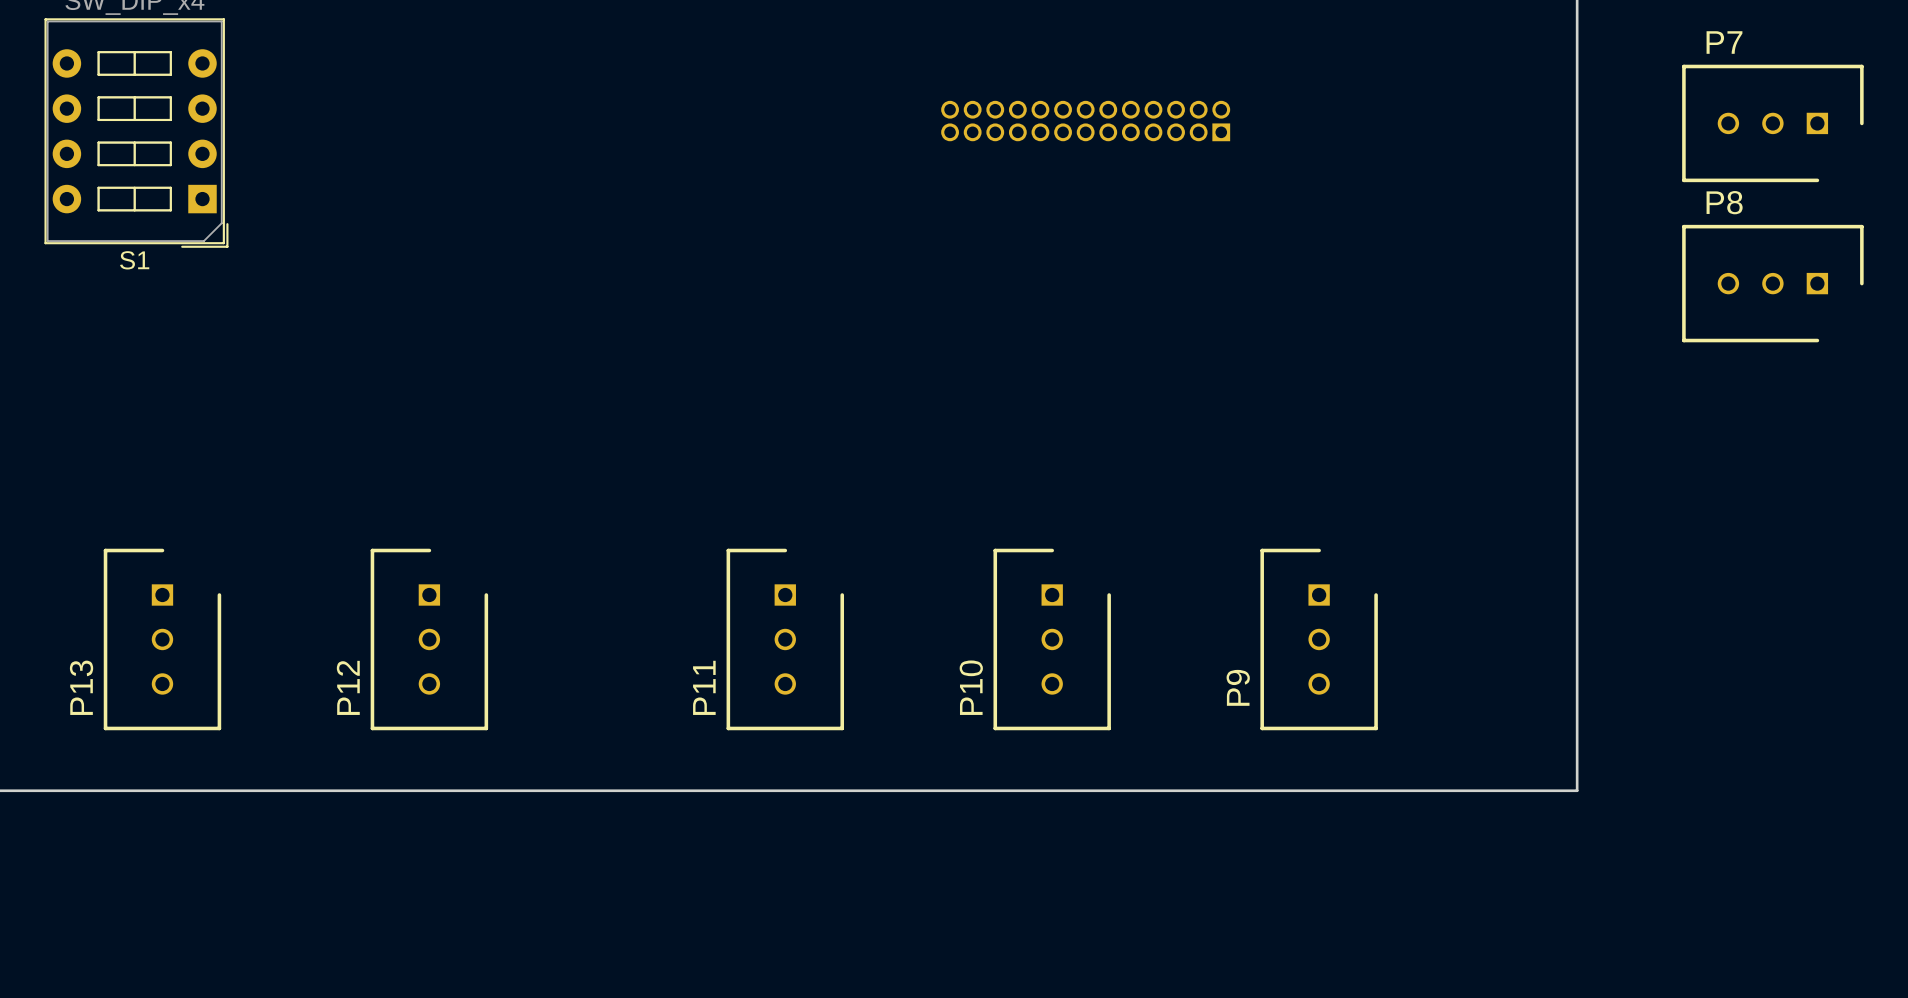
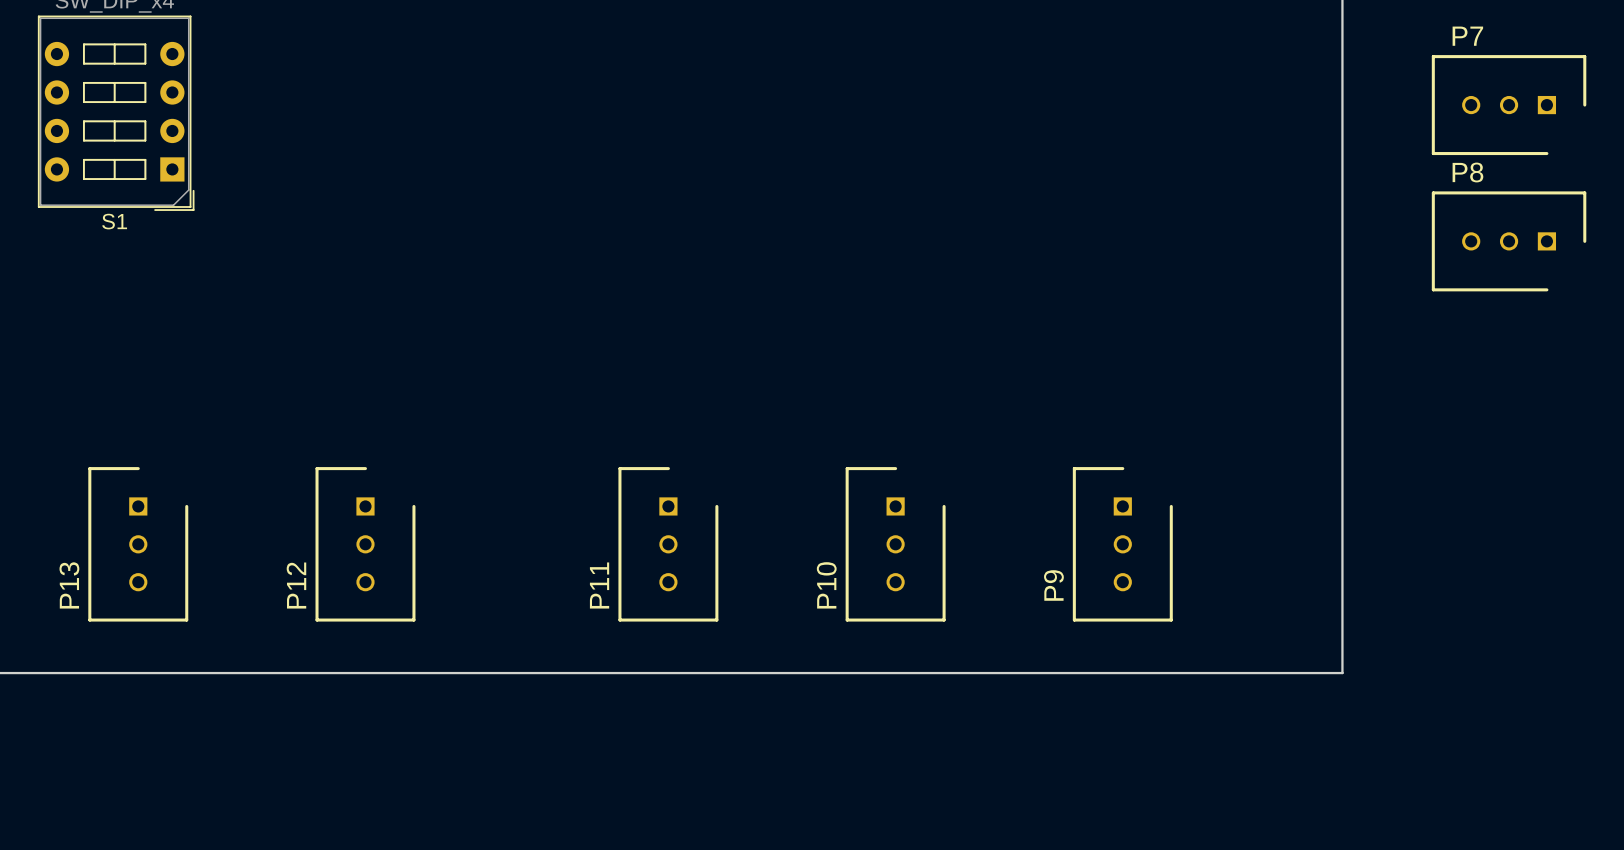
part: (1085, 121) -> none

